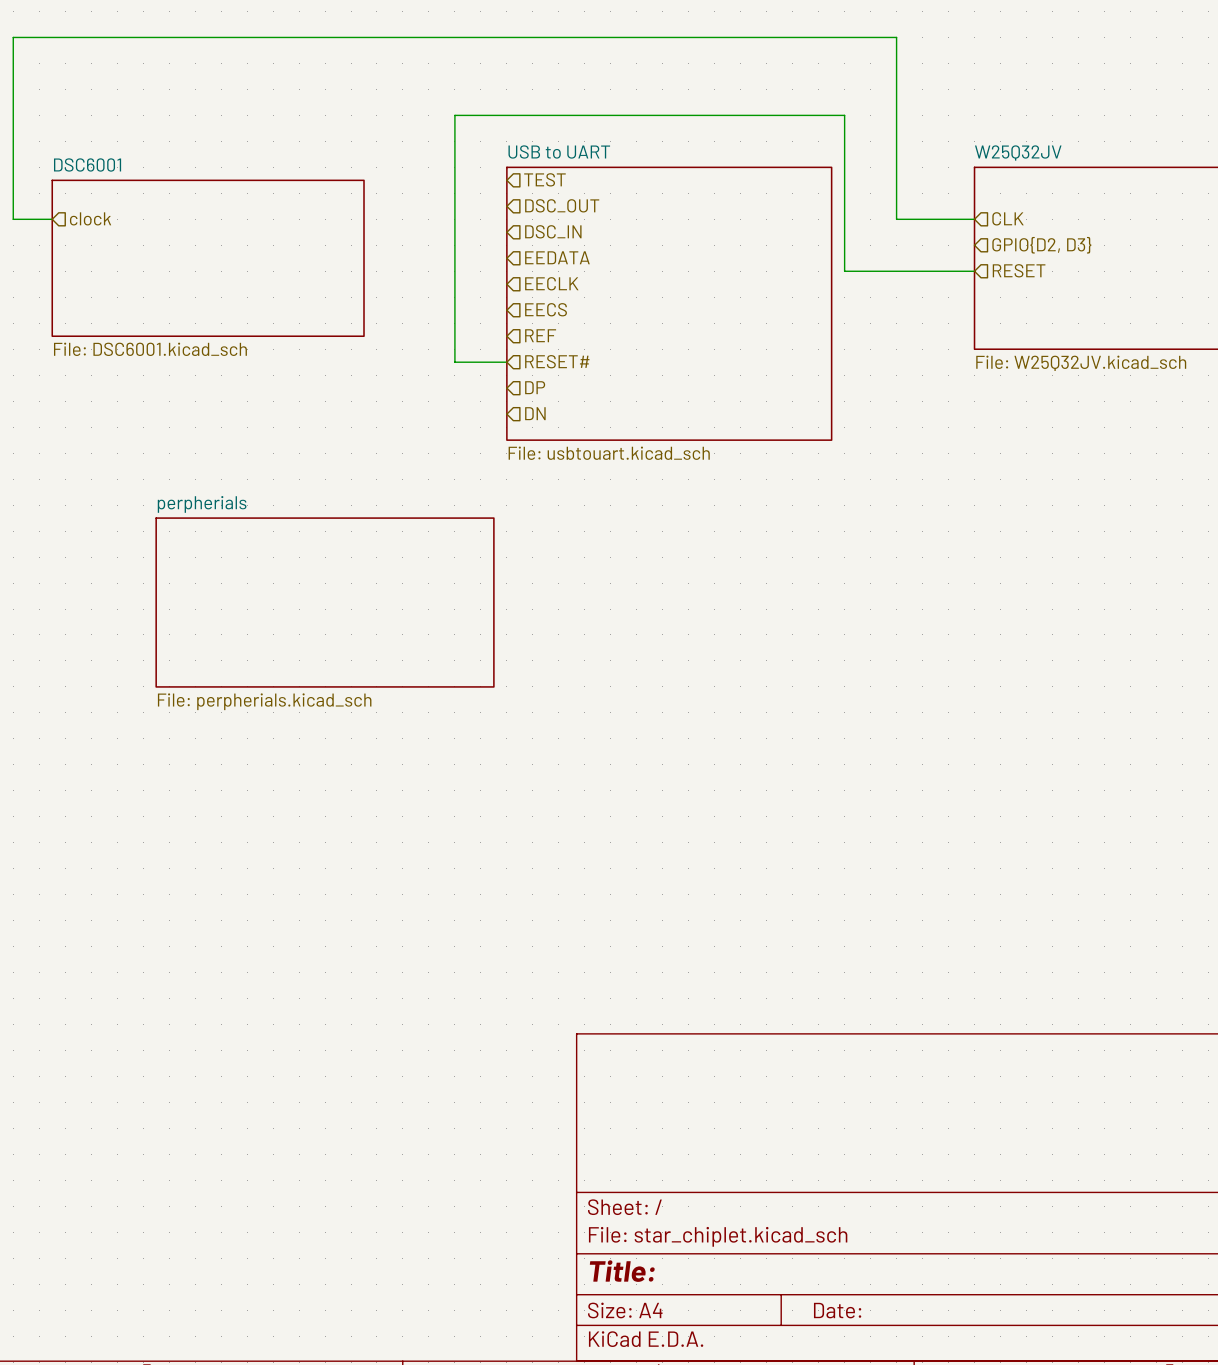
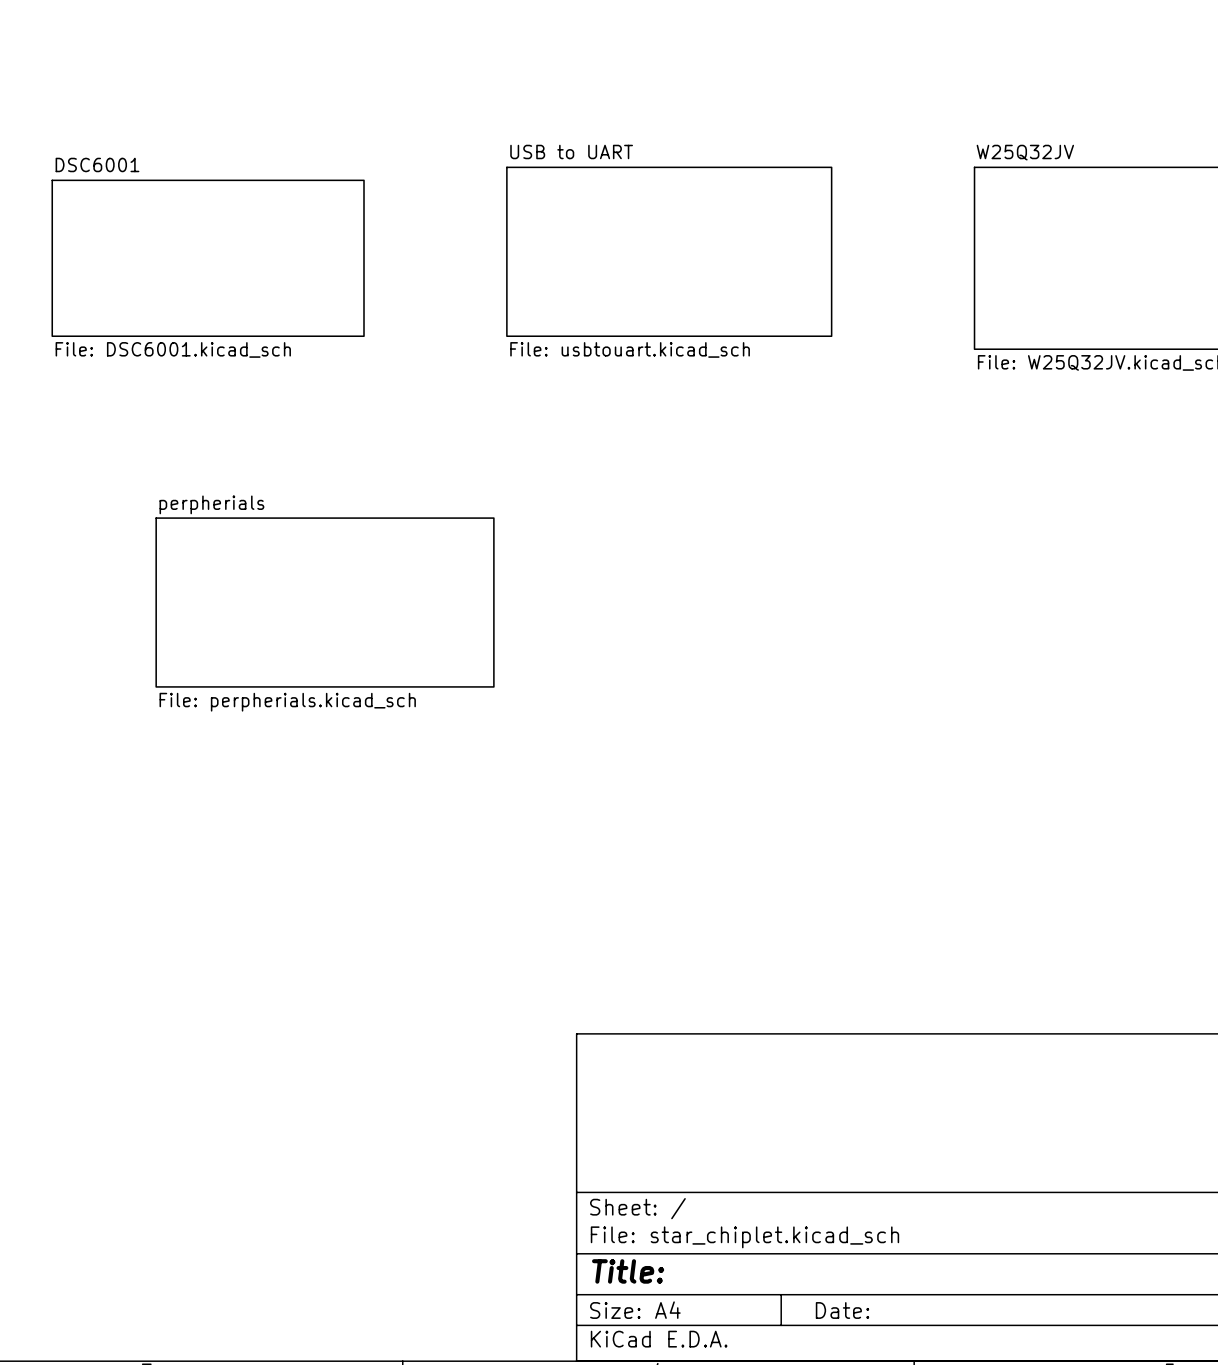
hierarchical label: TEST (544, 179) -> none
hierarchical label: DSC_OUT (562, 205) -> none
hierarchical label: clock (90, 218) -> none
hierarchical label: CLK (1008, 218) -> none
wire: (52, 219) (13, 219) (13, 37) (896, 37) (896, 219) (974, 219) -> none
hierarchical label: DSC_IN (553, 231) -> none
hierarchical label: GPIO{D2, D3} (1041, 245) -> none
sheet USB to UART: none -> File: usbtouart.kicad_sch (669, 251)
hierarchical label: EEDATA (557, 257) -> none
hierarchical label: RESET (1019, 270) -> none
wire: (974, 271) (844, 271) (844, 115) (454, 115) (454, 362) (506, 362) -> none
hierarchical label: EECLK (551, 283) -> none
sheet USB to UART: File: usbtouart.kicad_sch (669, 303) -> none
hierarchical label: EECS (546, 309) -> none
hierarchical label: REF (540, 335) -> none
hierarchical label: RESET# (557, 361) -> none
hierarchical label: DP (535, 387) -> none
hierarchical label: DN (535, 413) -> none

